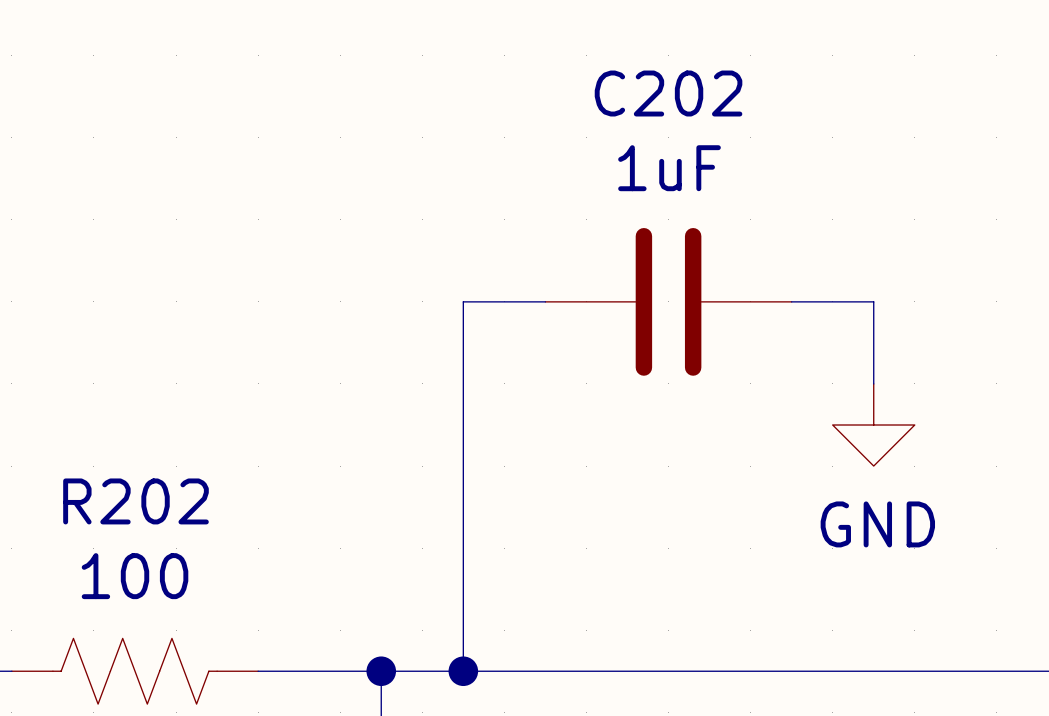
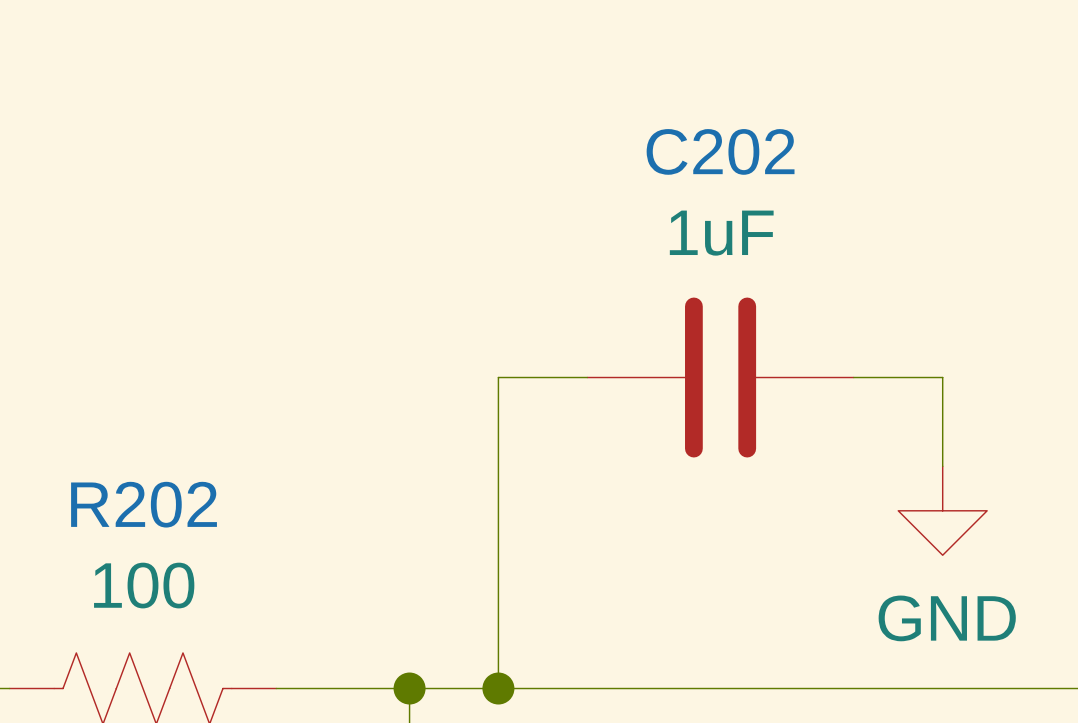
wire: (545, 301) (463, 301) (463, 383) -> (587, 377) (498, 377)
C202 position: (668, 301) -> (720, 377)
wire: (791, 301) (873, 301) (873, 383) -> (853, 377) (942, 377) (942, 466)
power symbol position: GND (873, 425) -> GND (942, 510)

